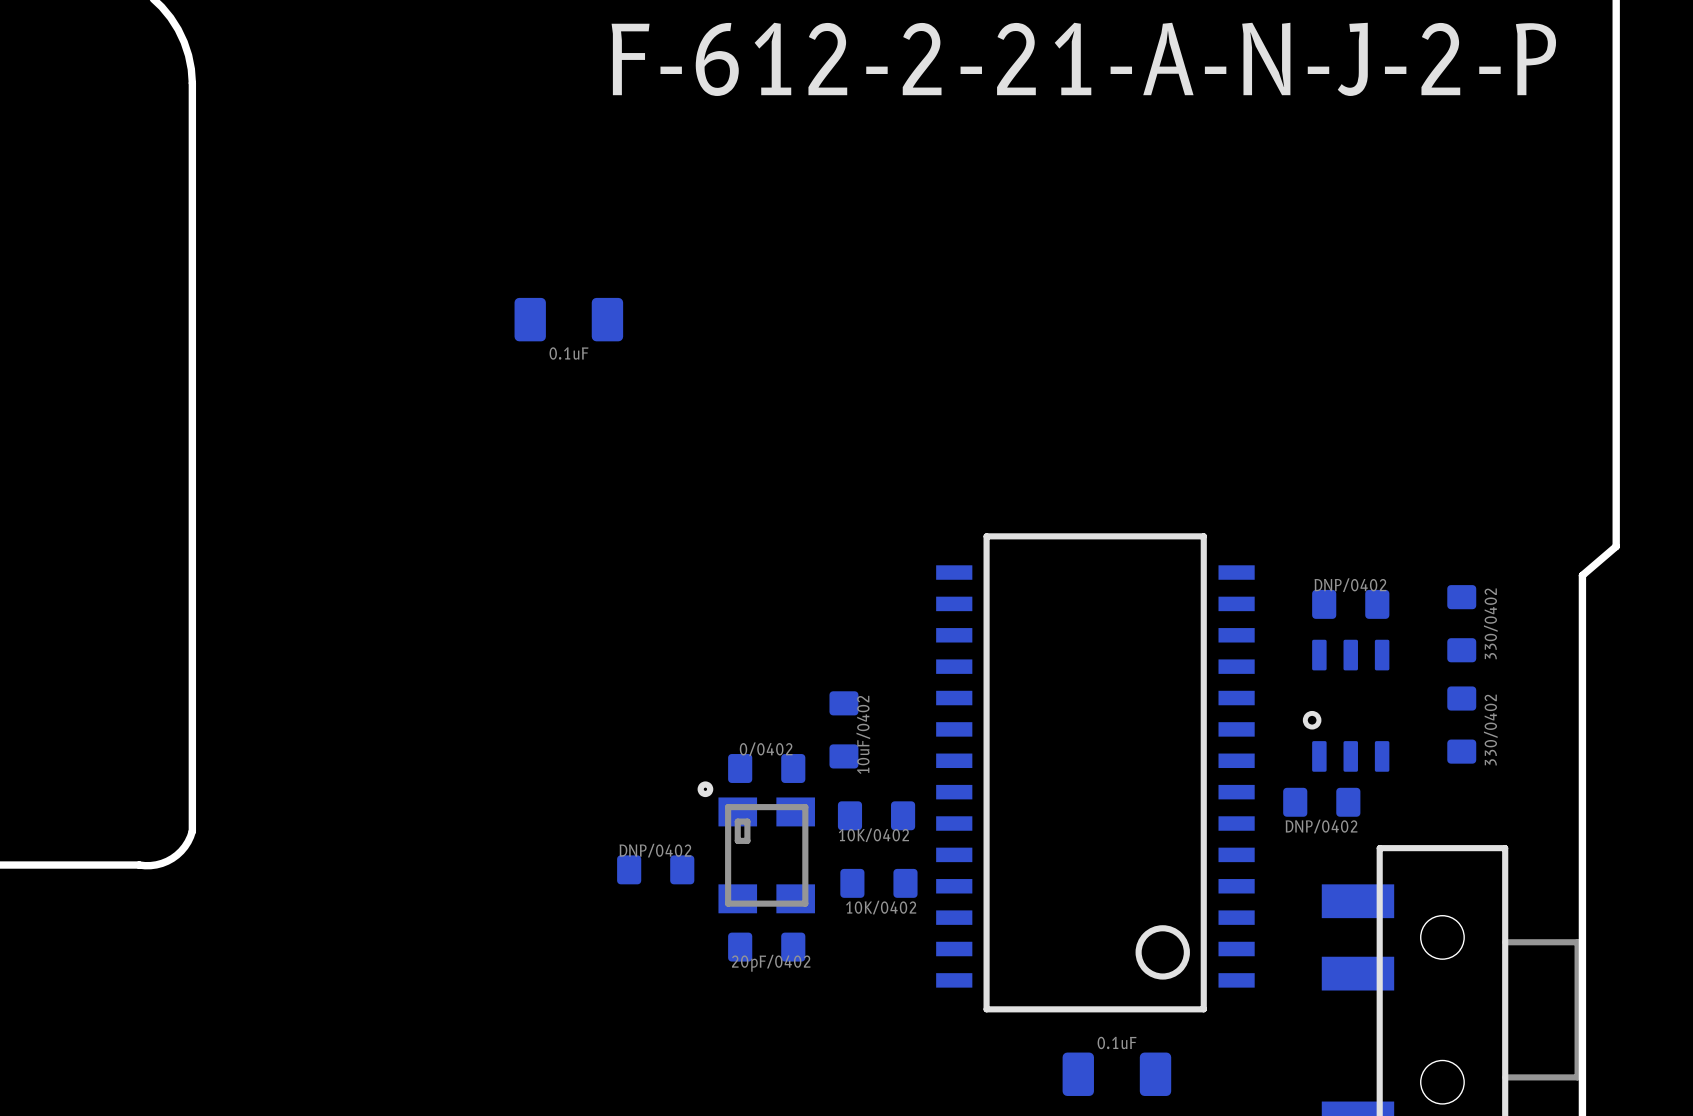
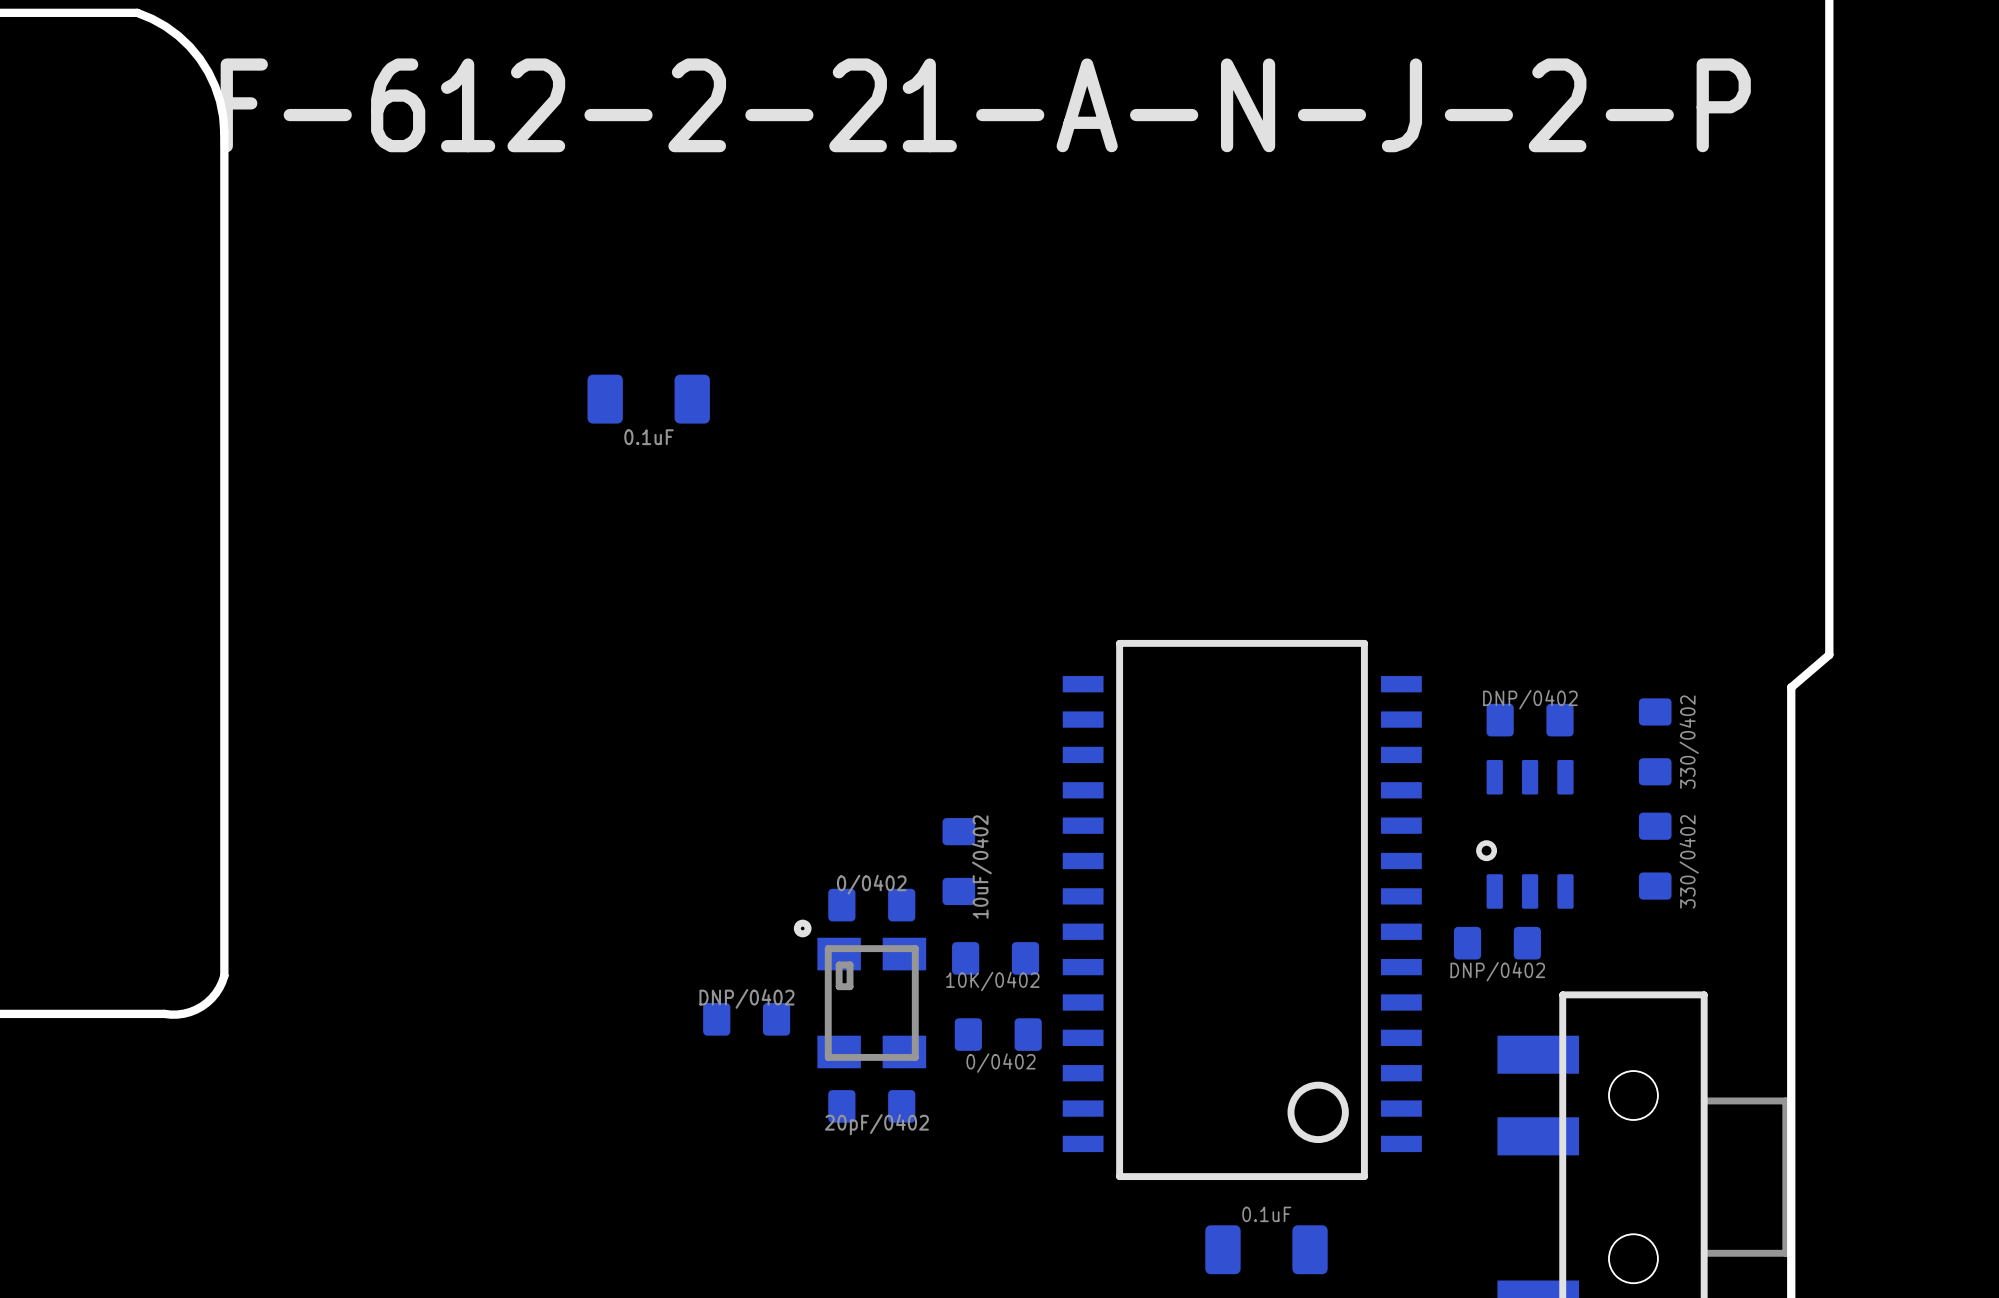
part value: 10K/0402 (881, 907) -> 0/0402 (1000, 1063)

